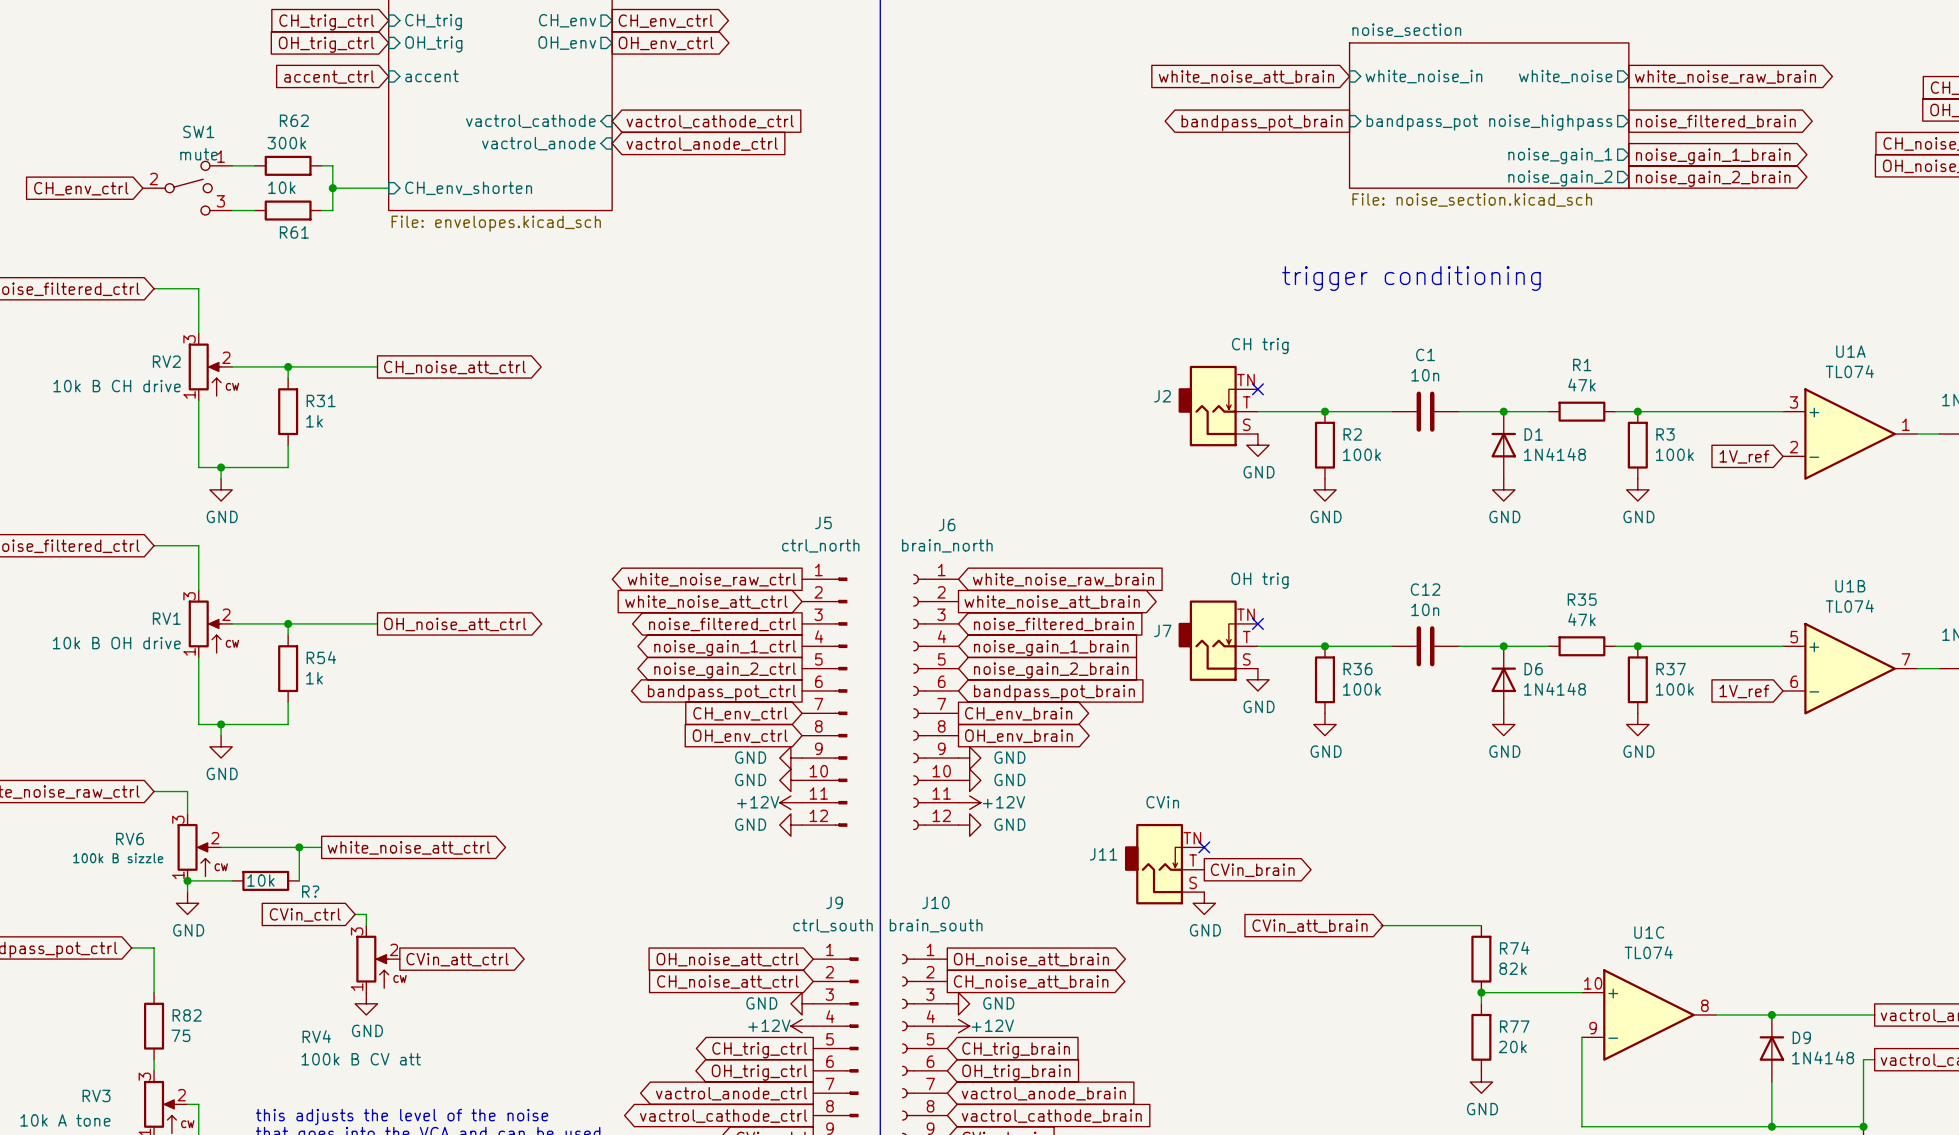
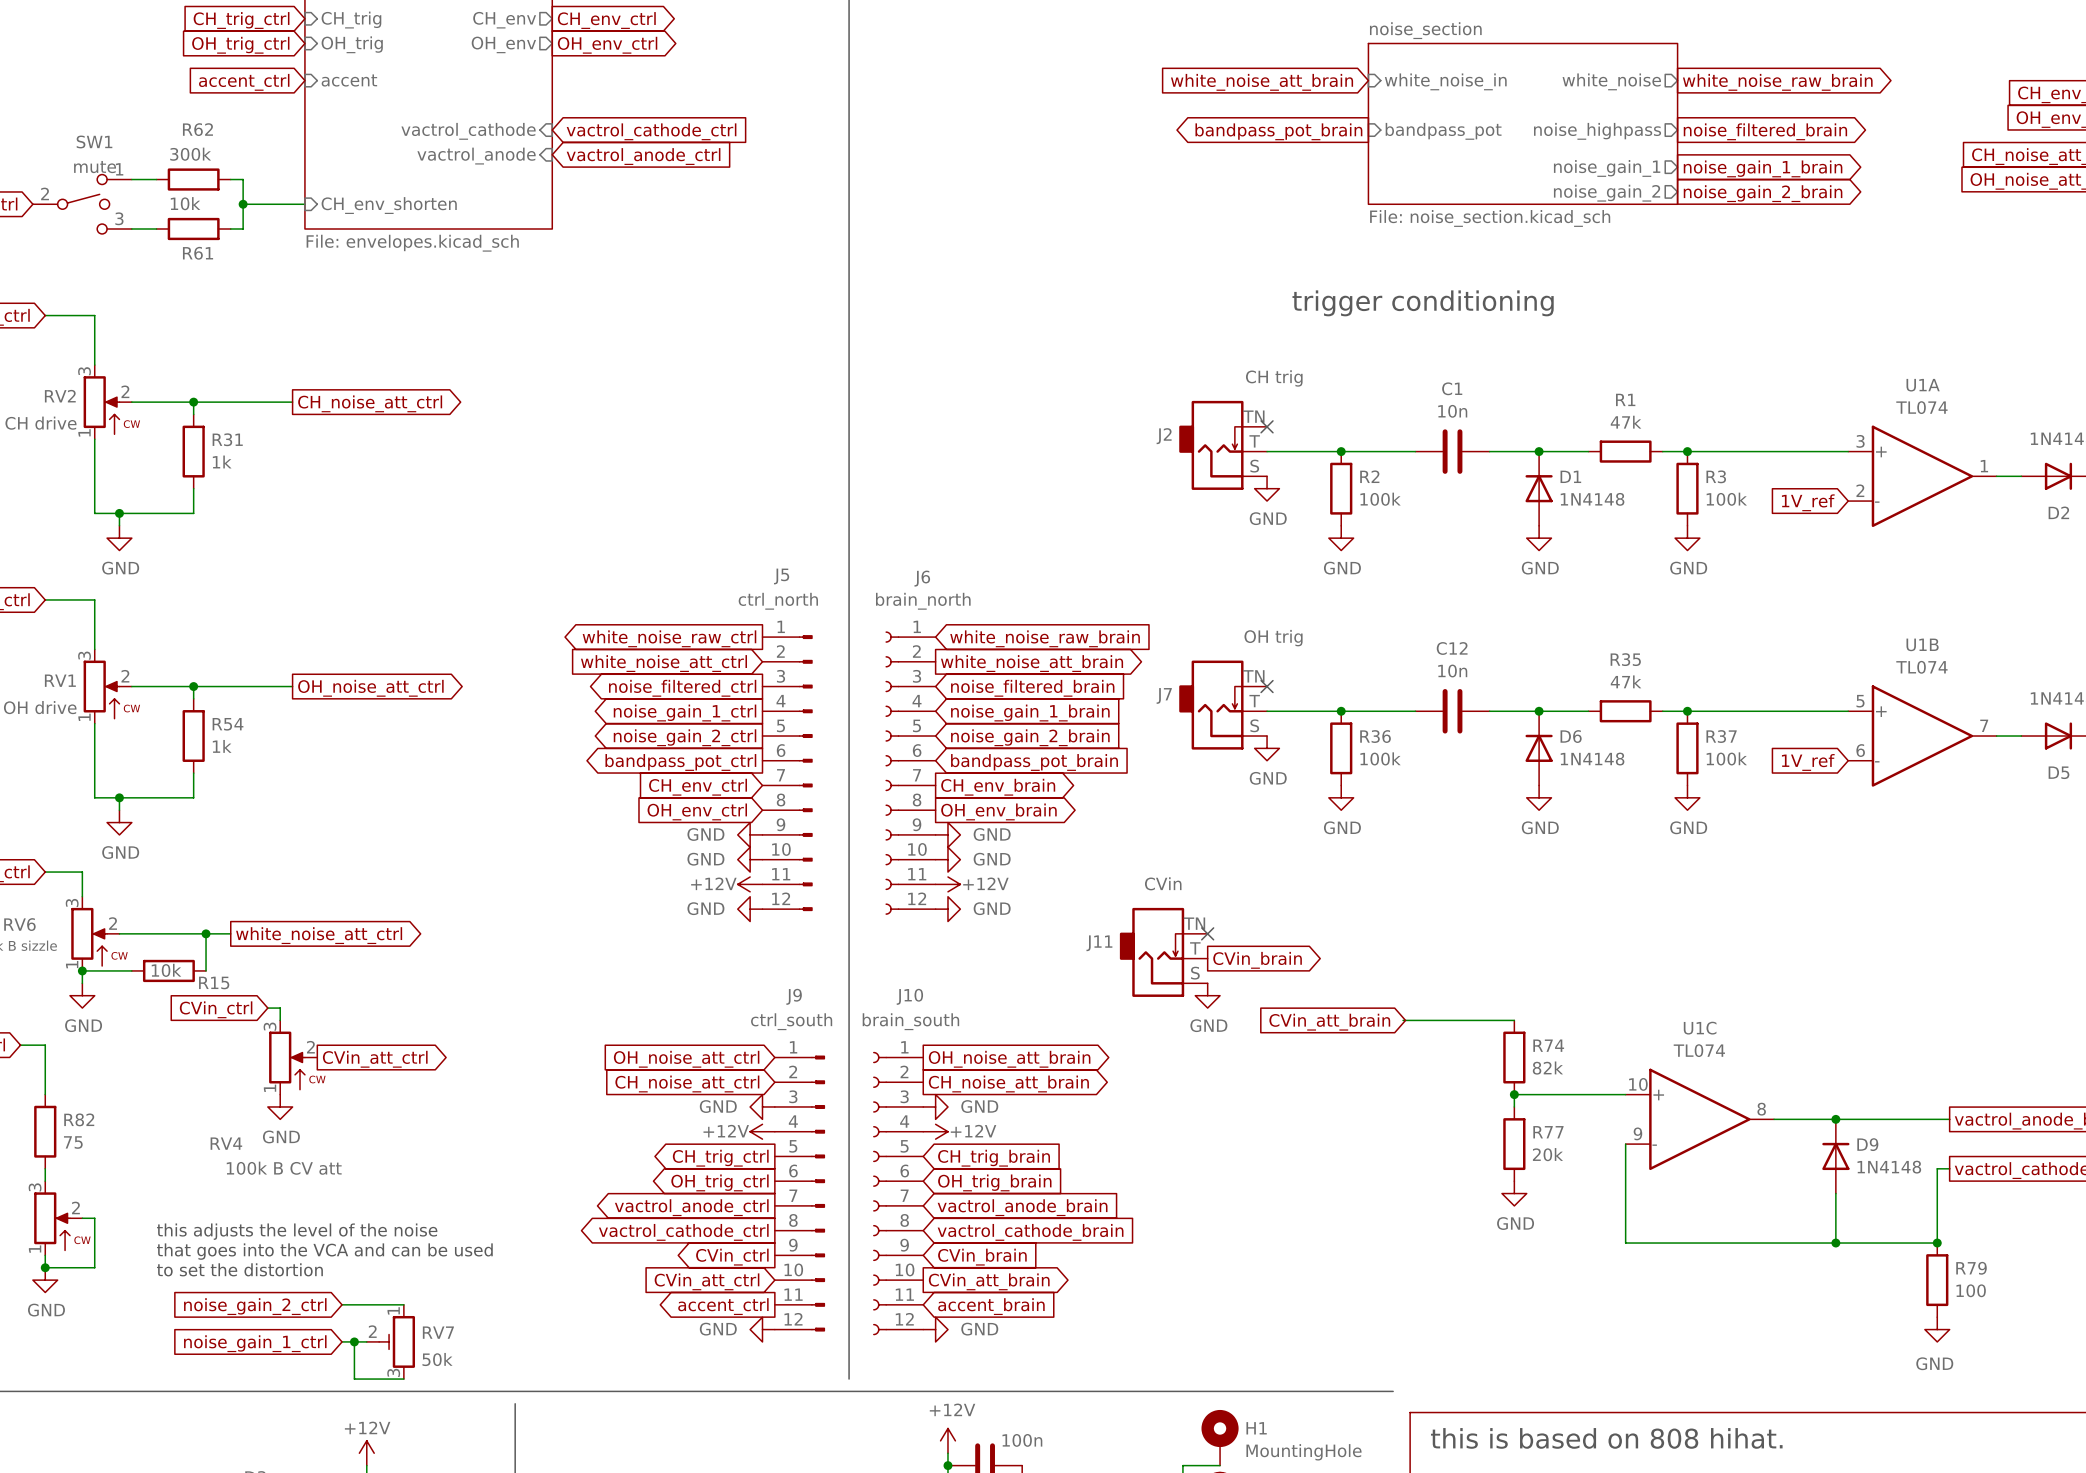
R? name: R? (310, 891) -> R15 (214, 982)

